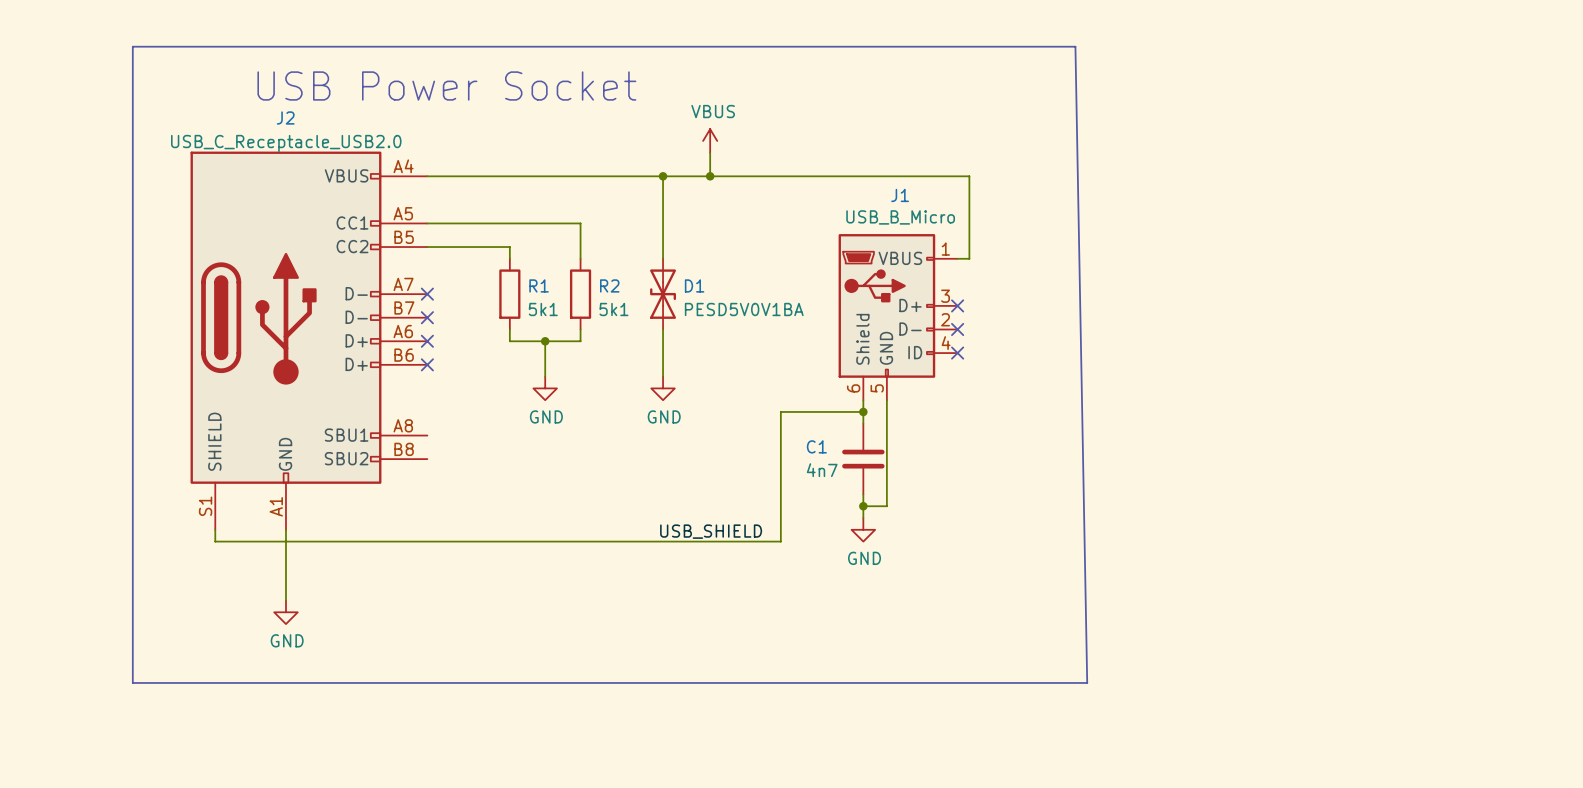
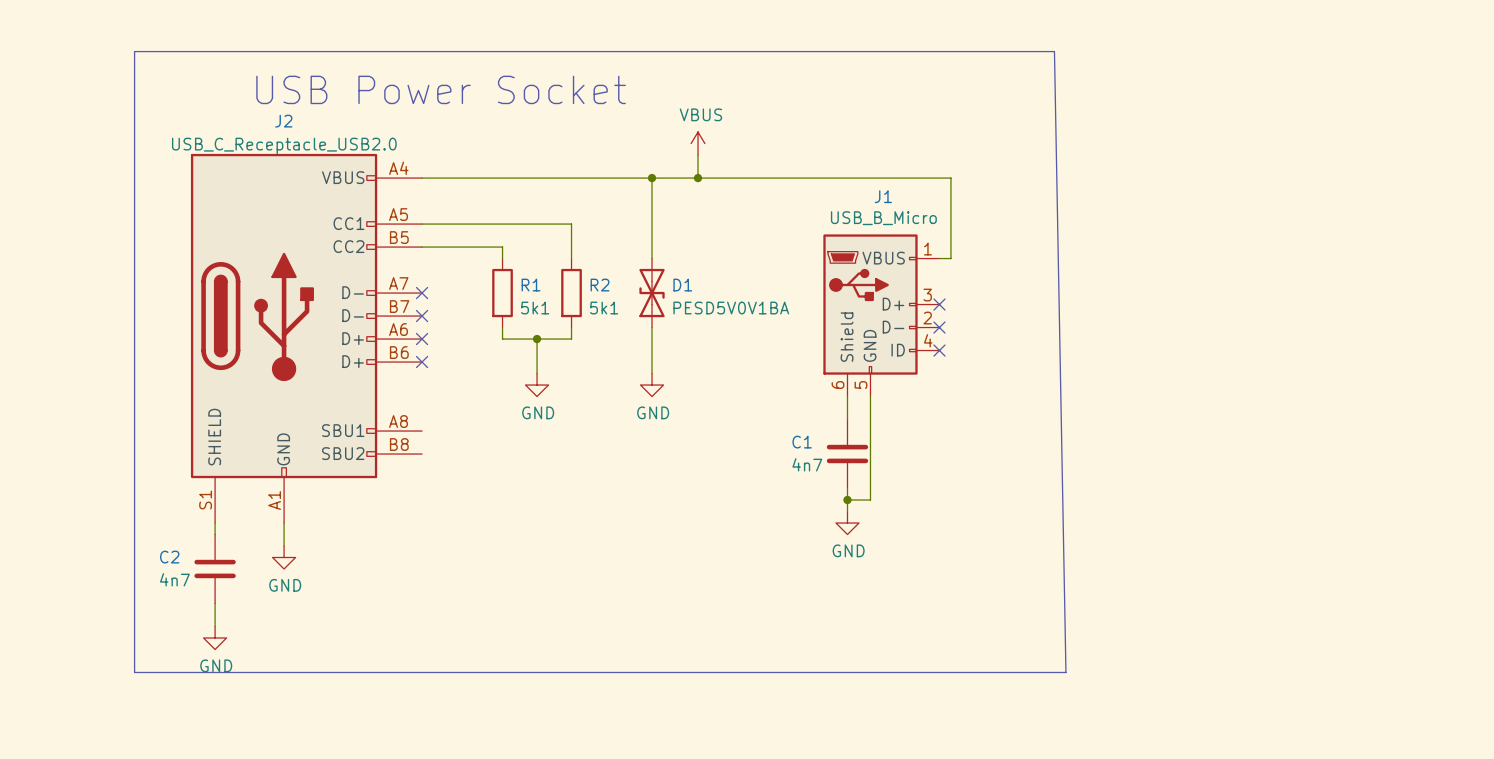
wire: (863, 411) (780, 411) (780, 541) (215, 541) -> none
junction: (863, 411) -> none
label: USB_SHIELD (711, 531) -> none
wire: (285, 553) (285, 600) -> none
power symbol: none -> GND (284, 557)
C2: none -> 4n7 (215, 569)
wire: none -> (215, 603) (215, 626)
power symbol: GND (285, 612) -> none
power symbol: none -> GND (215, 637)

